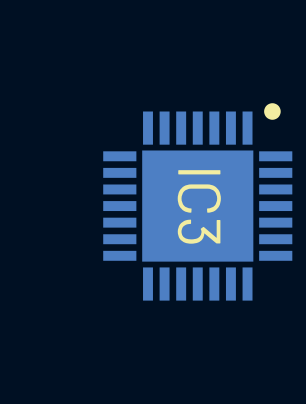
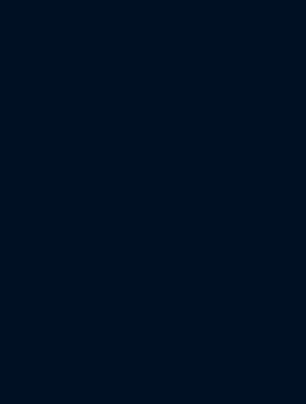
IC3: (197, 201) -> none

